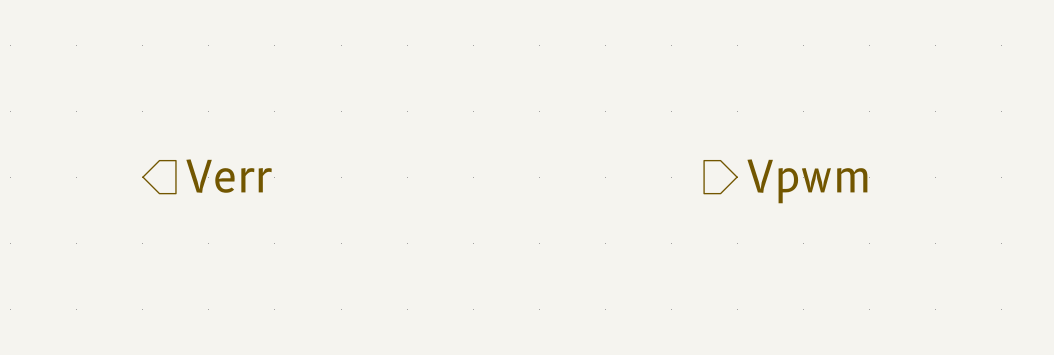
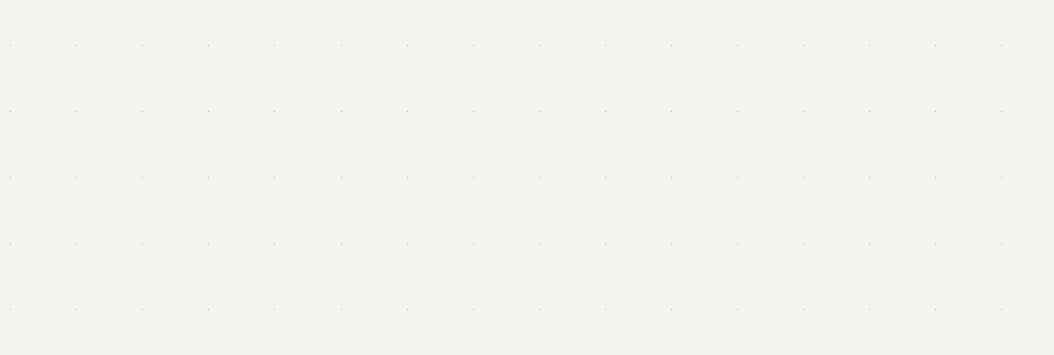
hierarchical label: Verr (229, 176) -> none
hierarchical label: Vpwm (807, 181) -> none

